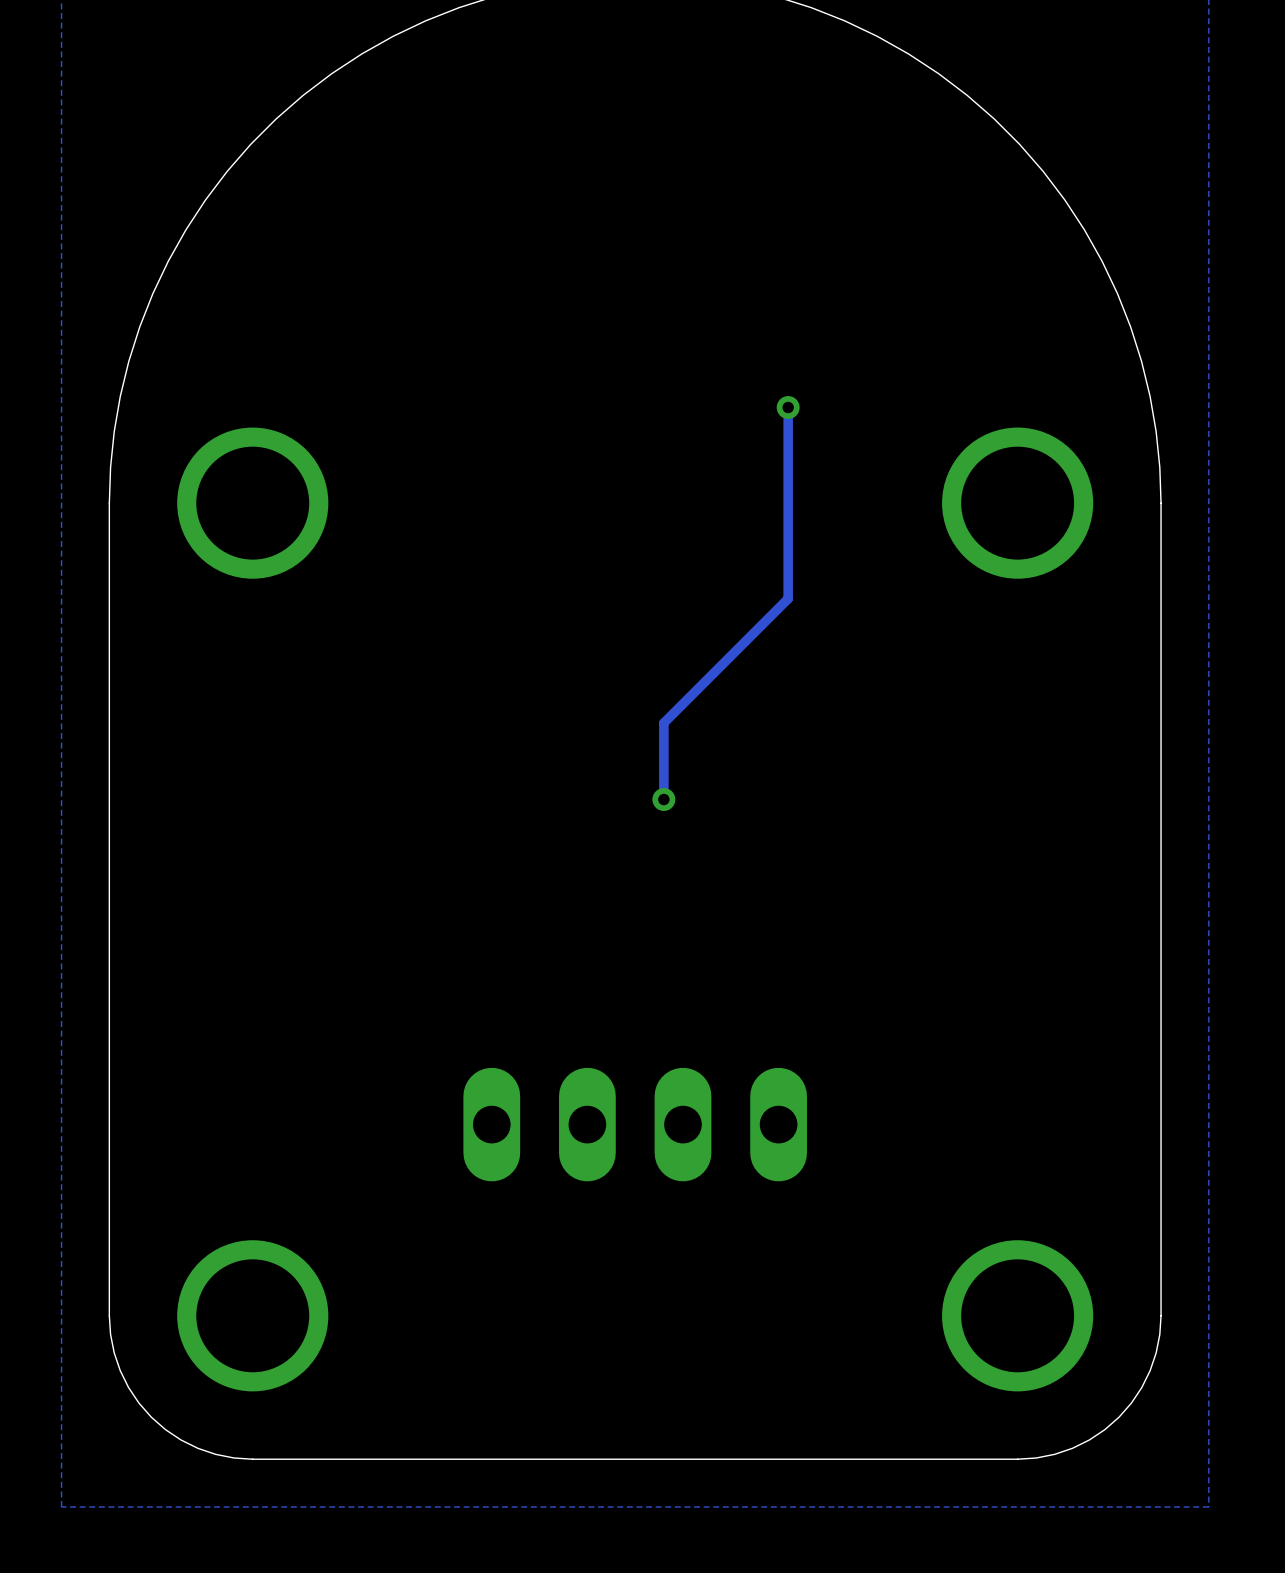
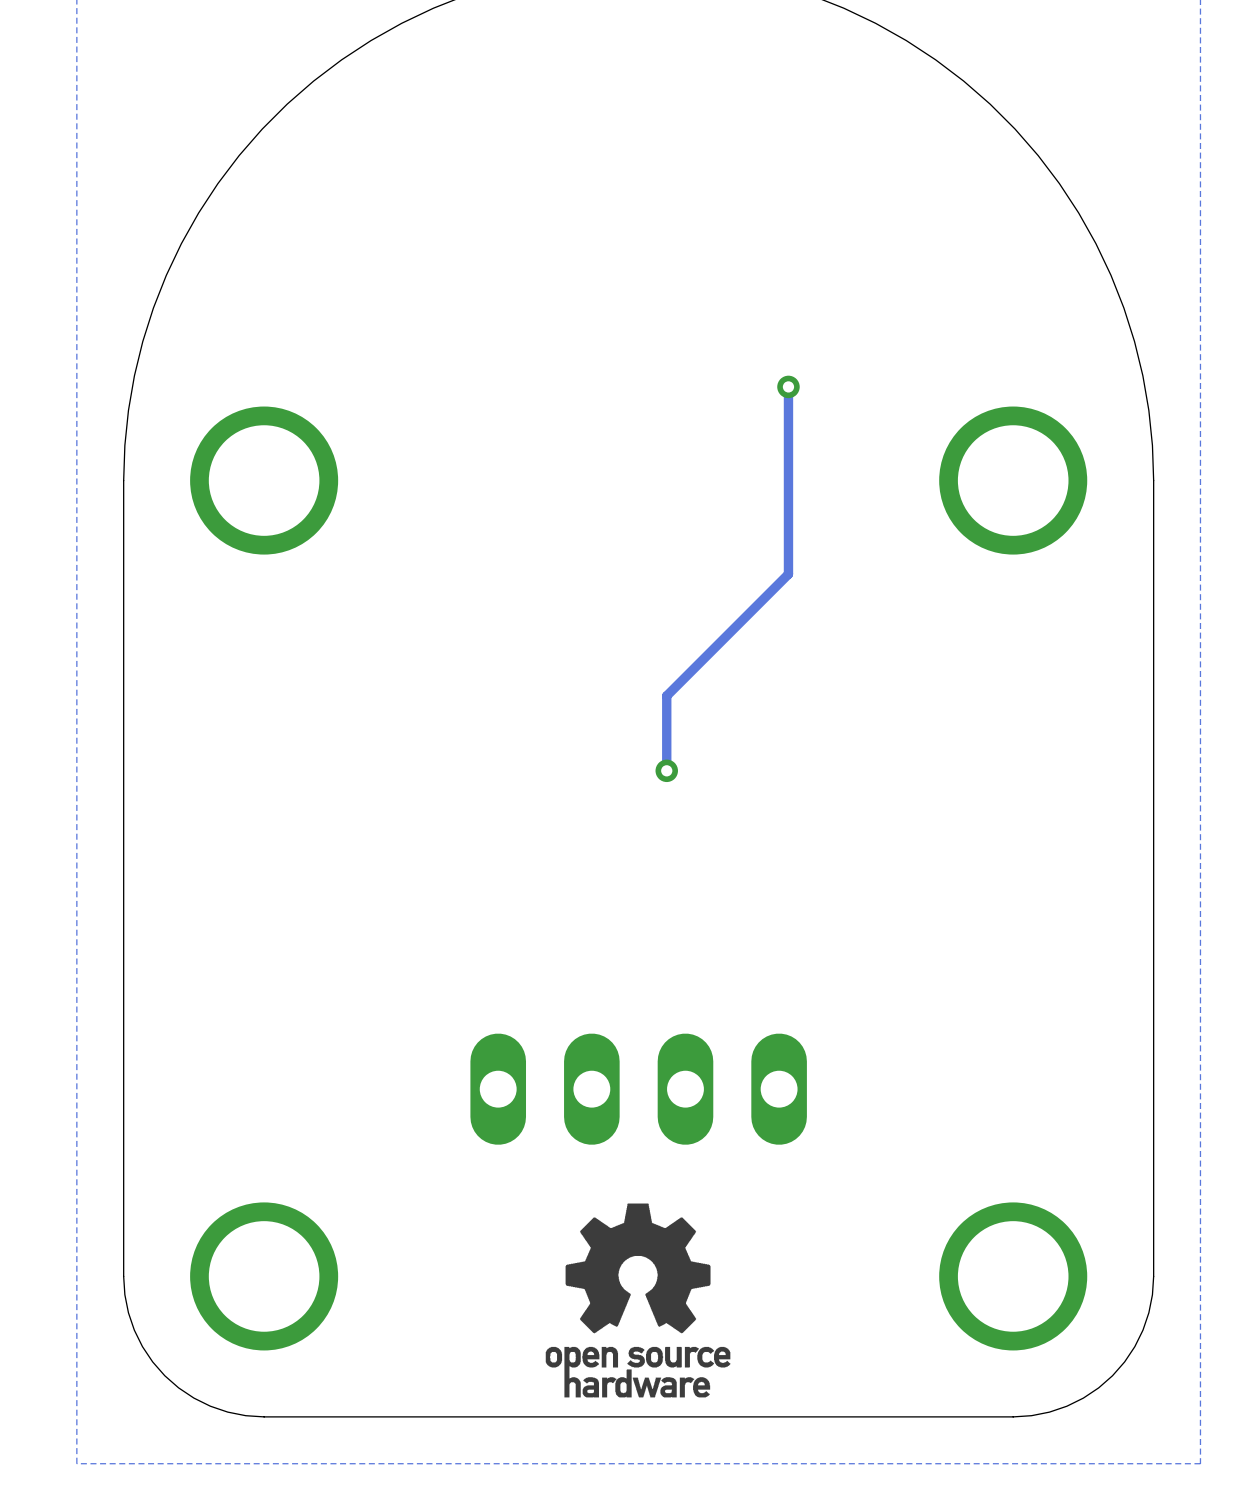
drawing: none -> [545, 1203, 731, 1398]

